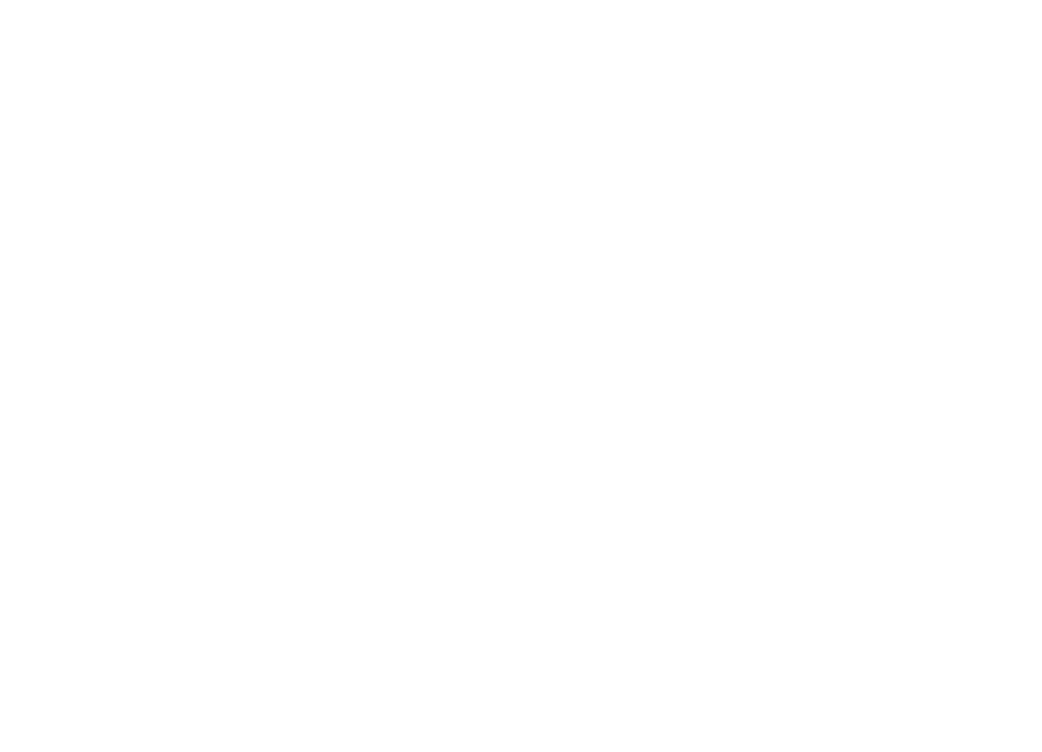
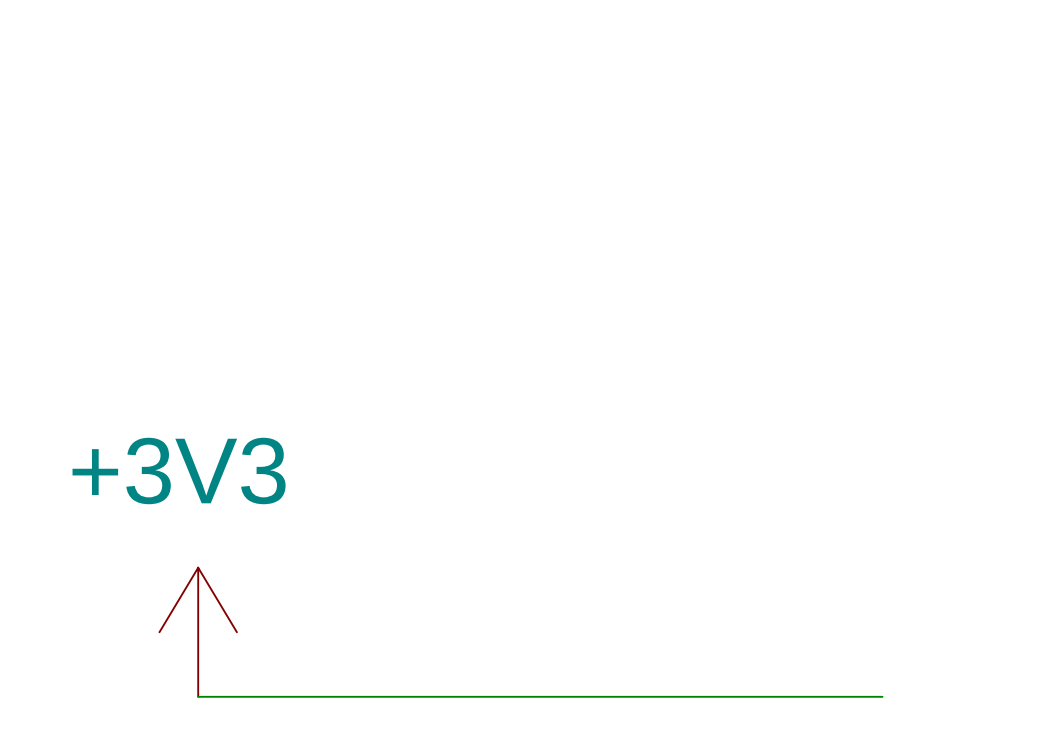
power symbol: none -> +3V3 (198, 632)
wire: none -> (198, 696) (882, 696)

